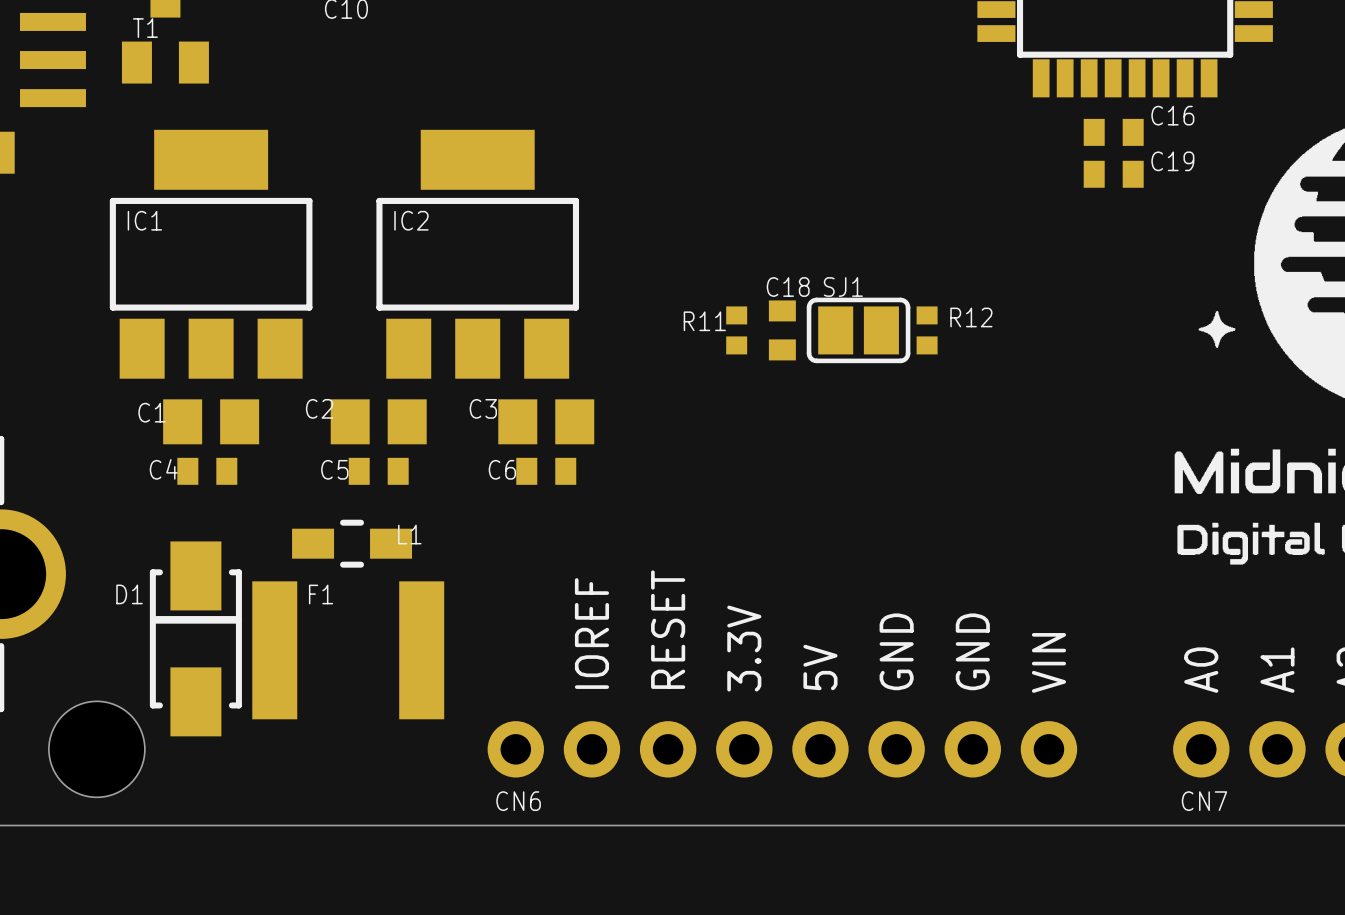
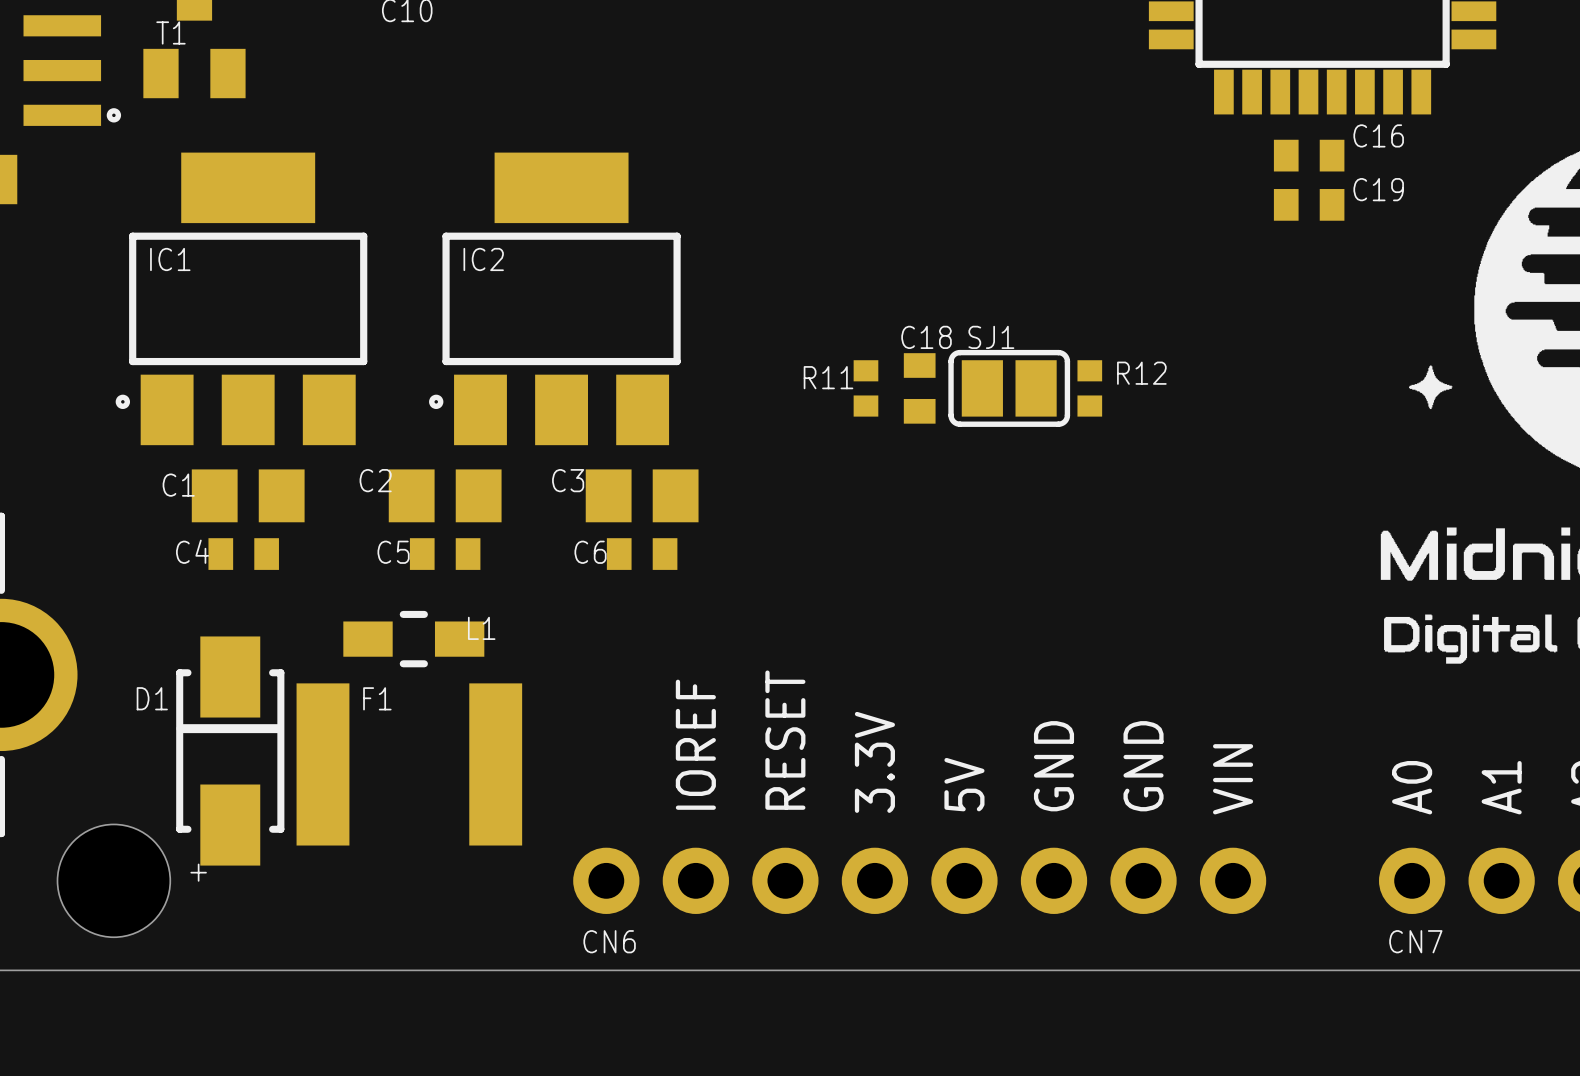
drawing: none -> [106, 108, 122, 123]
drawing: none -> [115, 394, 131, 410]
drawing: none -> [429, 394, 444, 410]
text: none -> + (198, 872)

